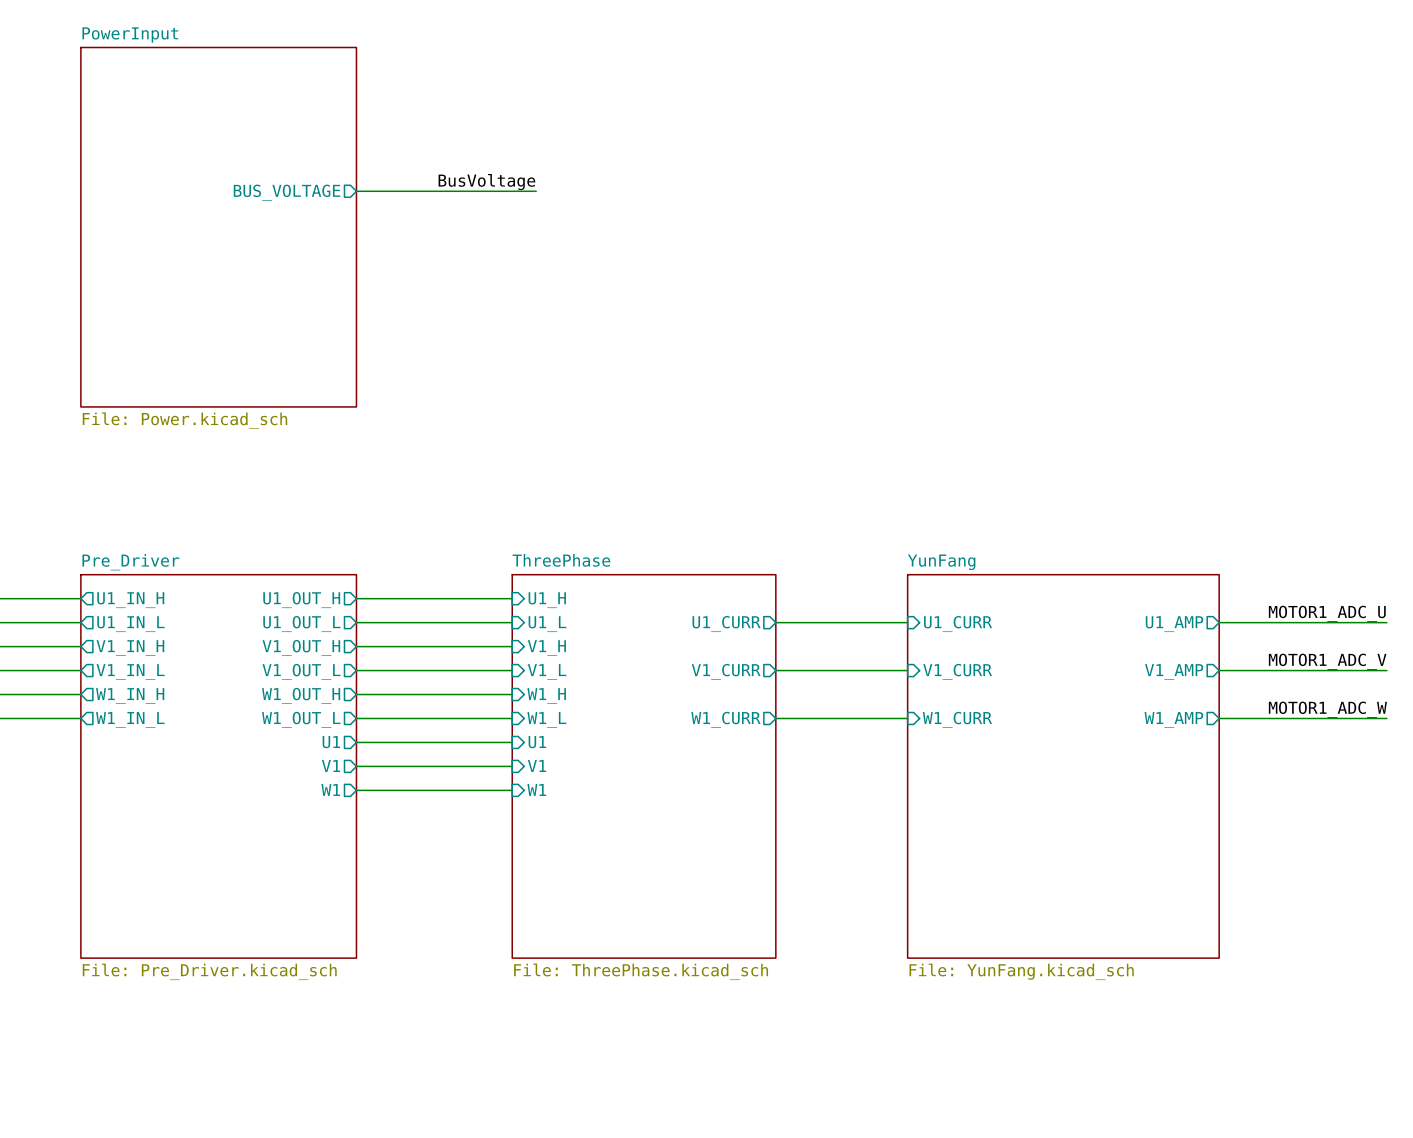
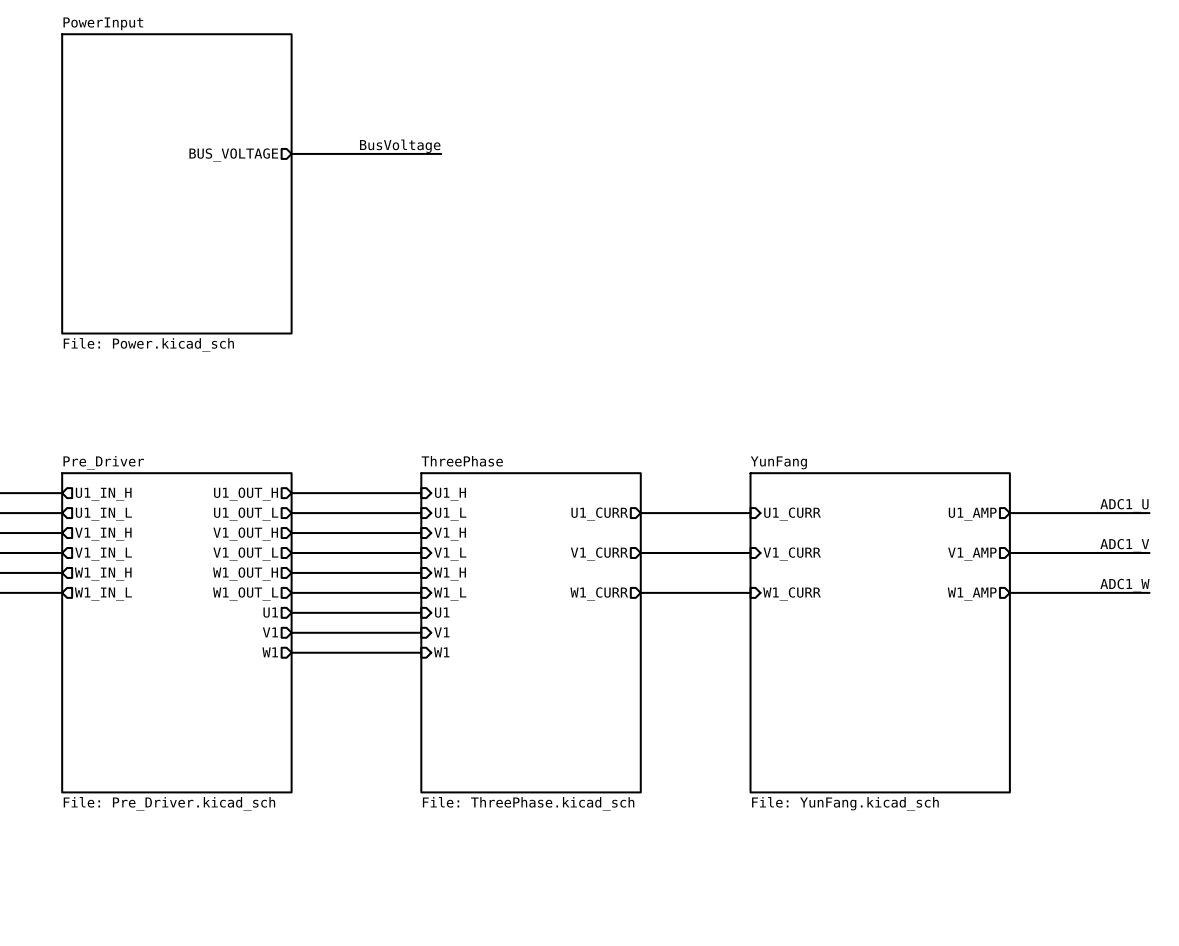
label: MOTOR1_ADC_U (1327, 613) -> ADC1_U (1124, 505)
label: MOTOR1_ADC_V (1327, 661) -> ADC1_V (1124, 545)
label: MOTOR1_ADC_W (1327, 709) -> ADC1_W (1124, 585)

